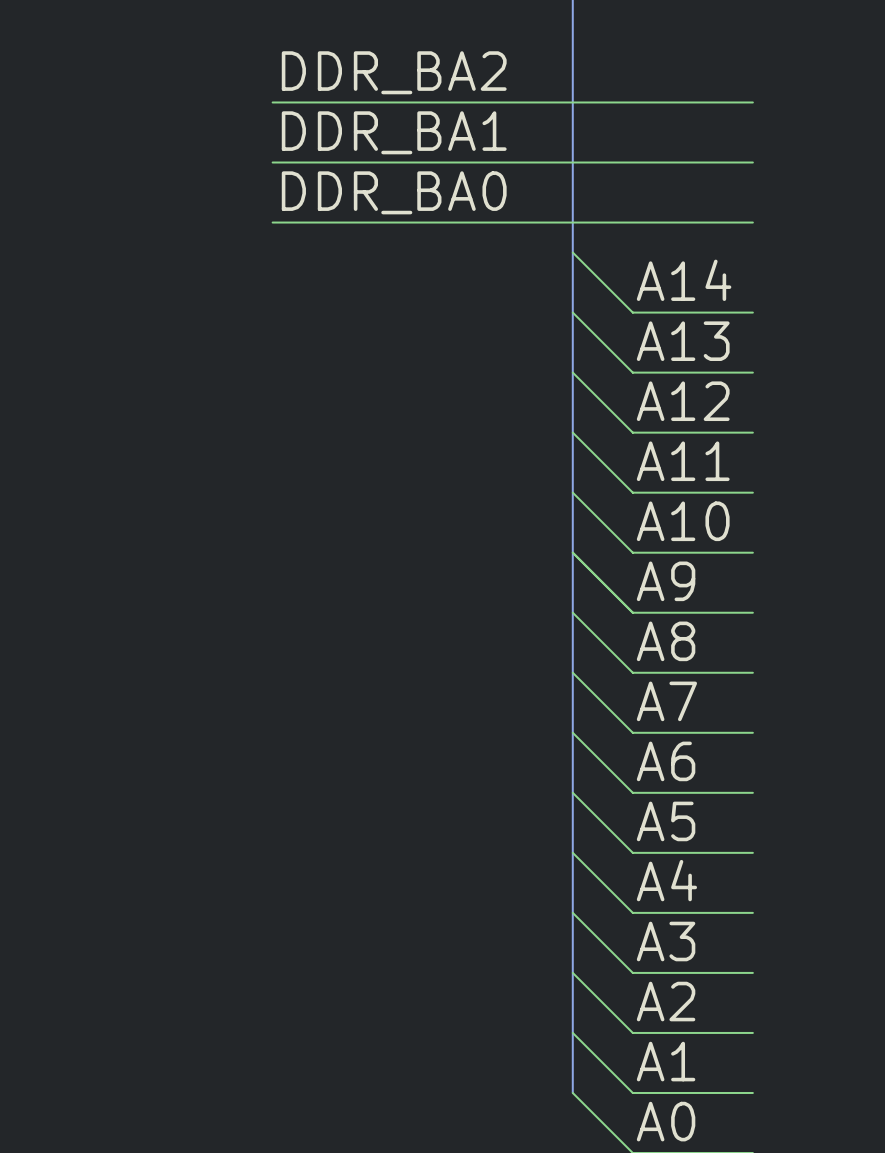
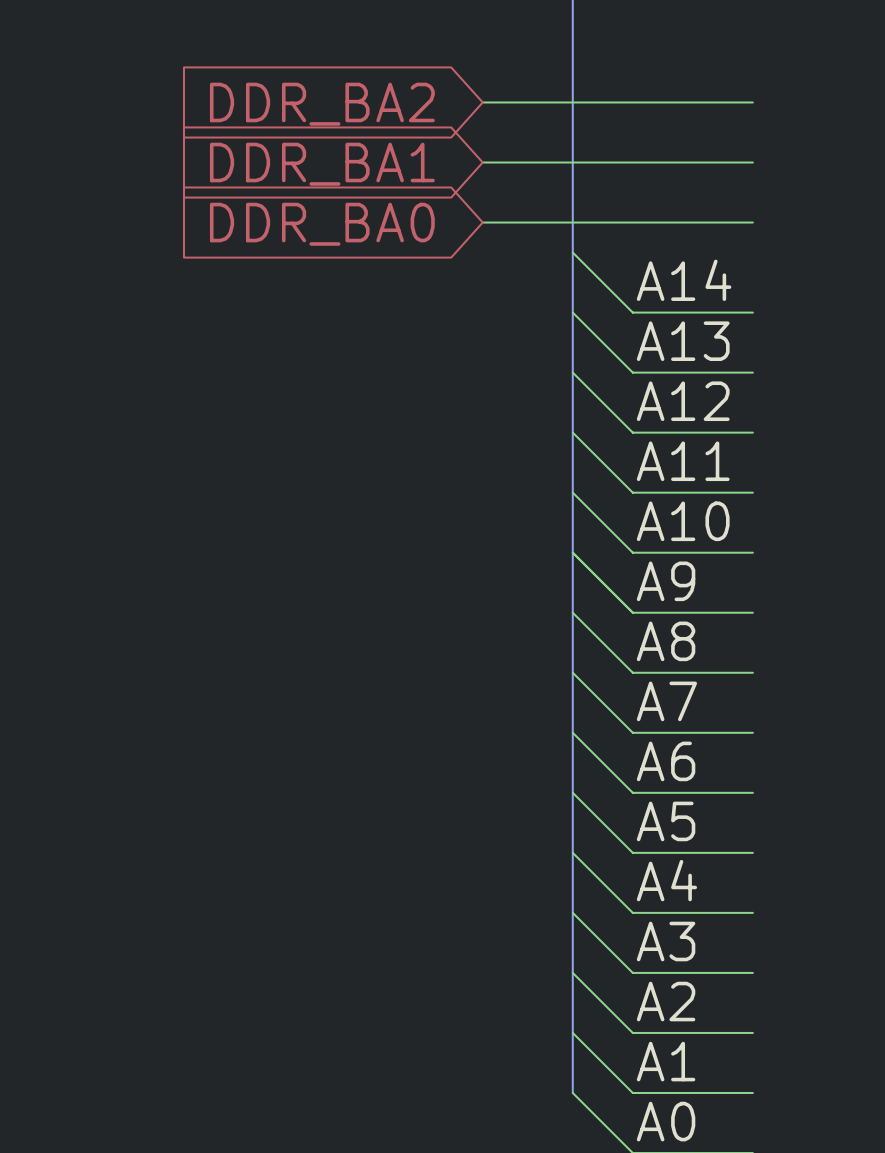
label: DDR_BA2 (394, 72) -> none
wire: (272, 102) (482, 102) -> none
global label: none -> DDR_BA2 (322, 104)
label: DDR_BA1 (394, 132) -> none
wire: (272, 162) (482, 162) -> none
global label: none -> DDR_BA1 (322, 164)
label: DDR_BA0 (394, 192) -> none
wire: (272, 222) (482, 222) -> none
global label: none -> DDR_BA0 (322, 224)

